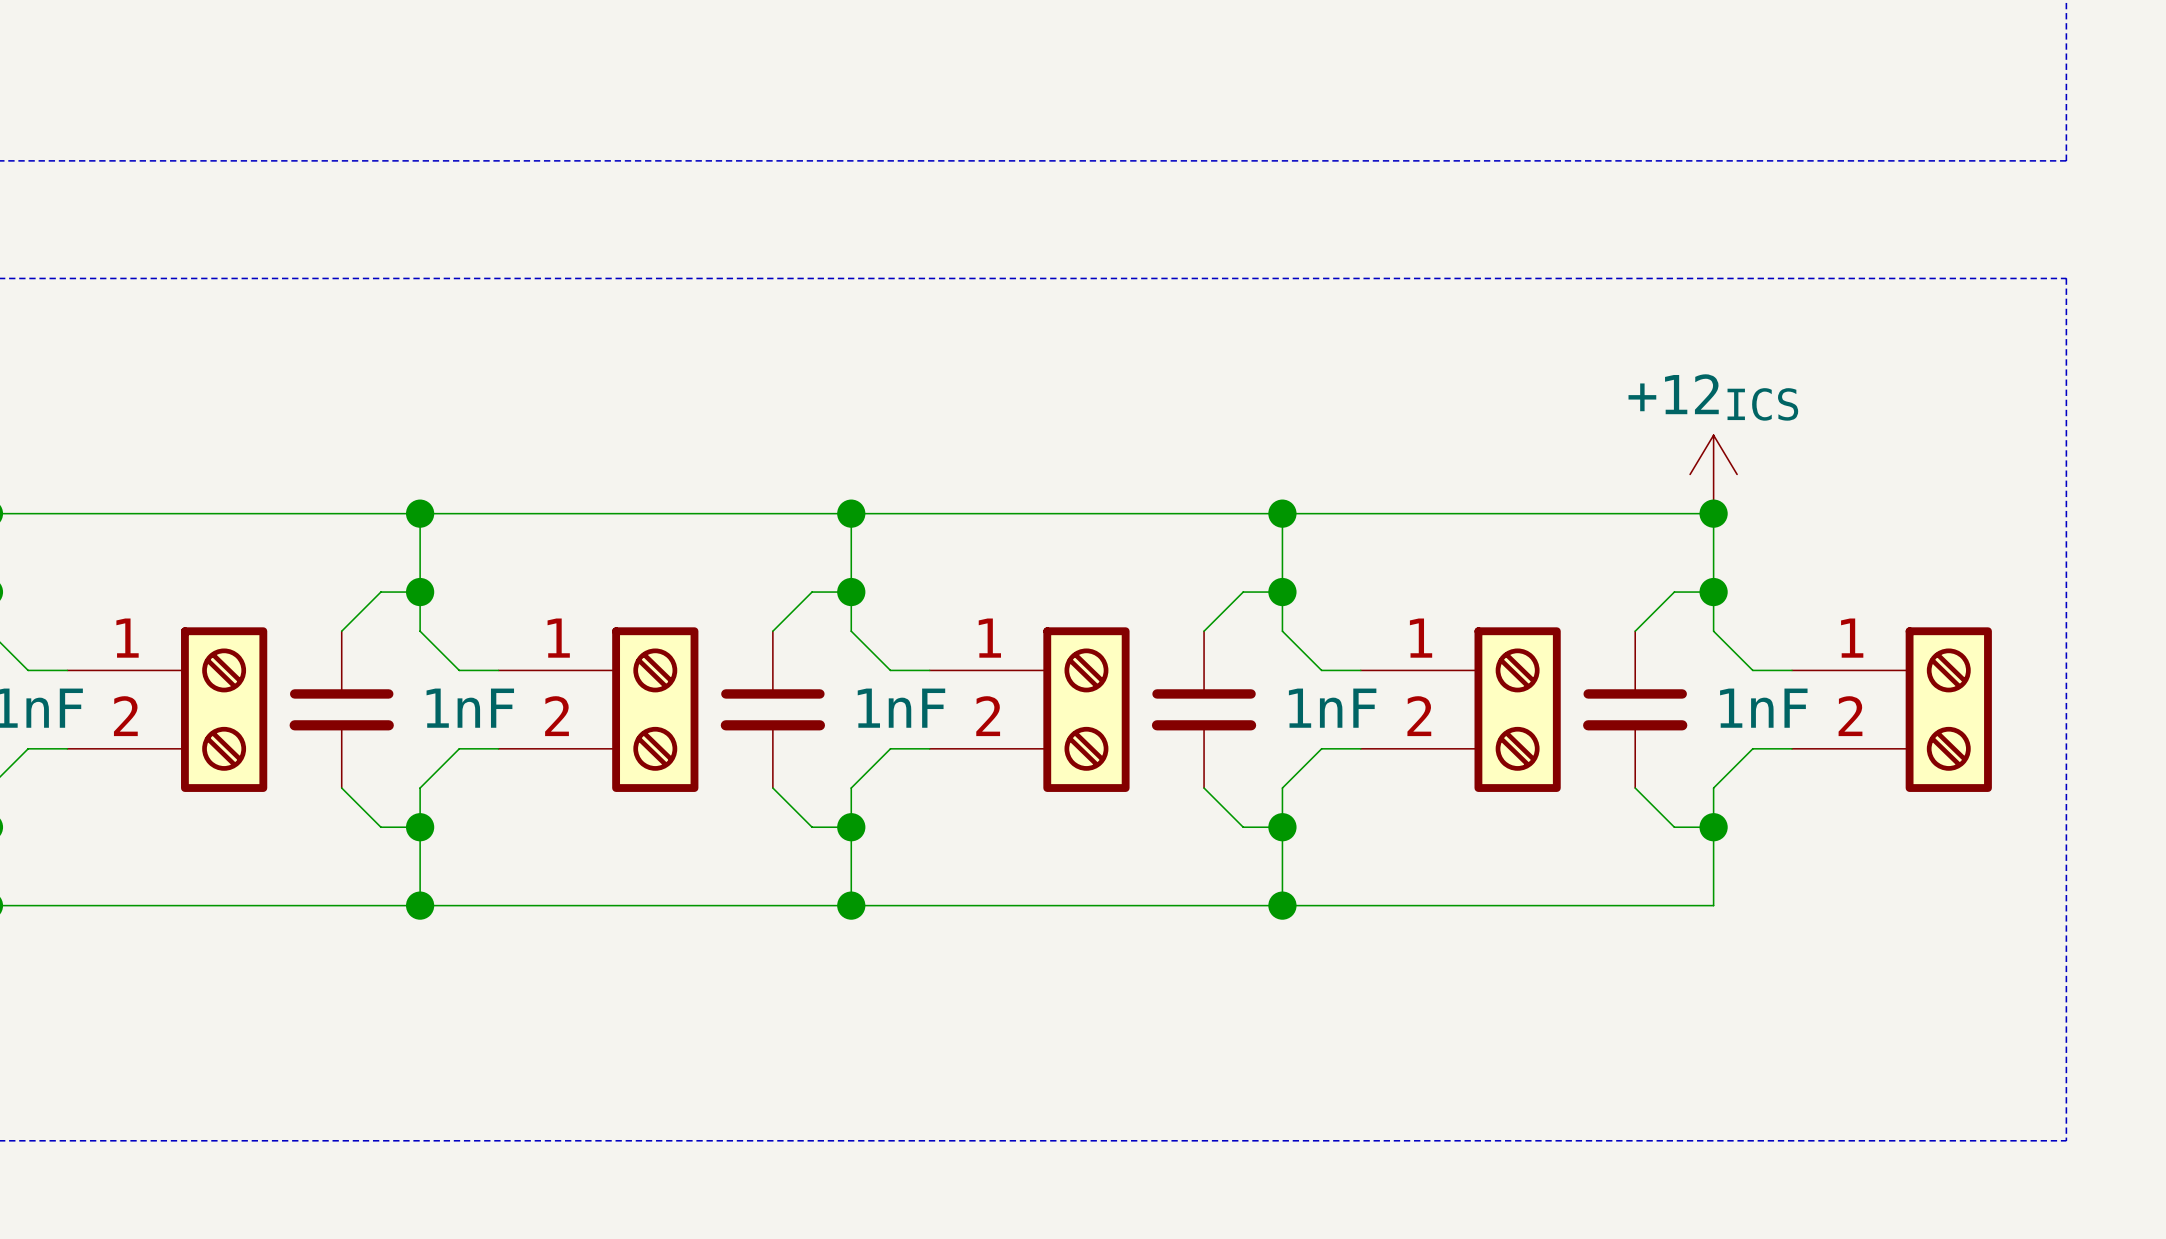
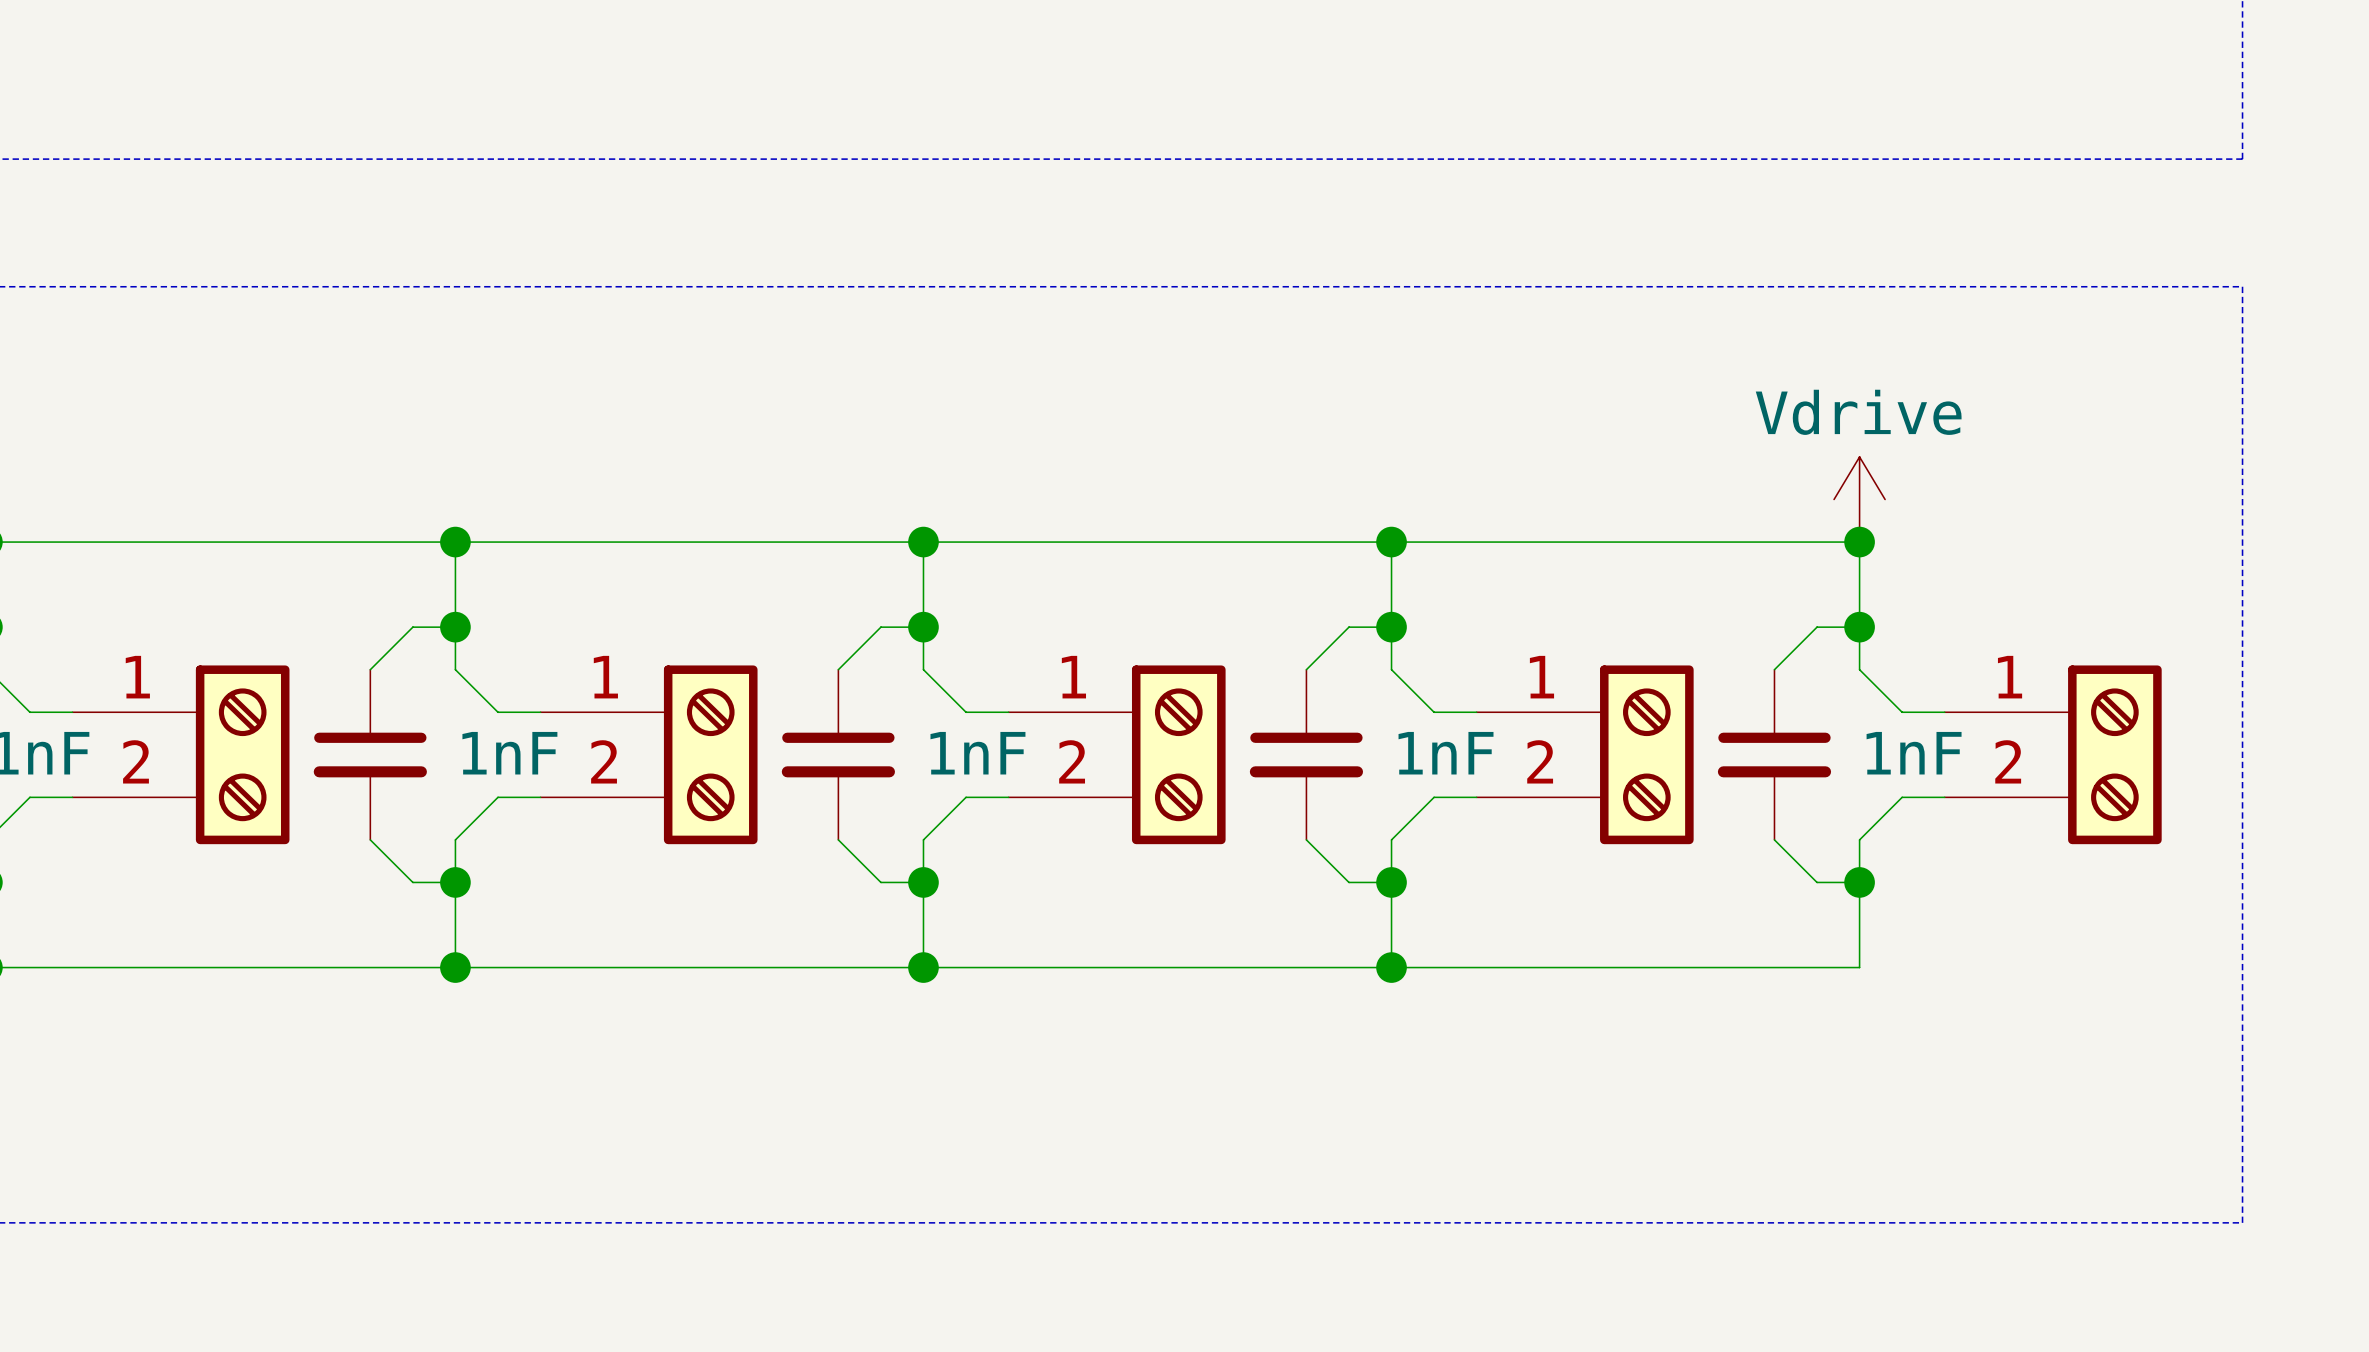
power symbol: +12ICS (1713, 474) -> Vdrive (1859, 499)

